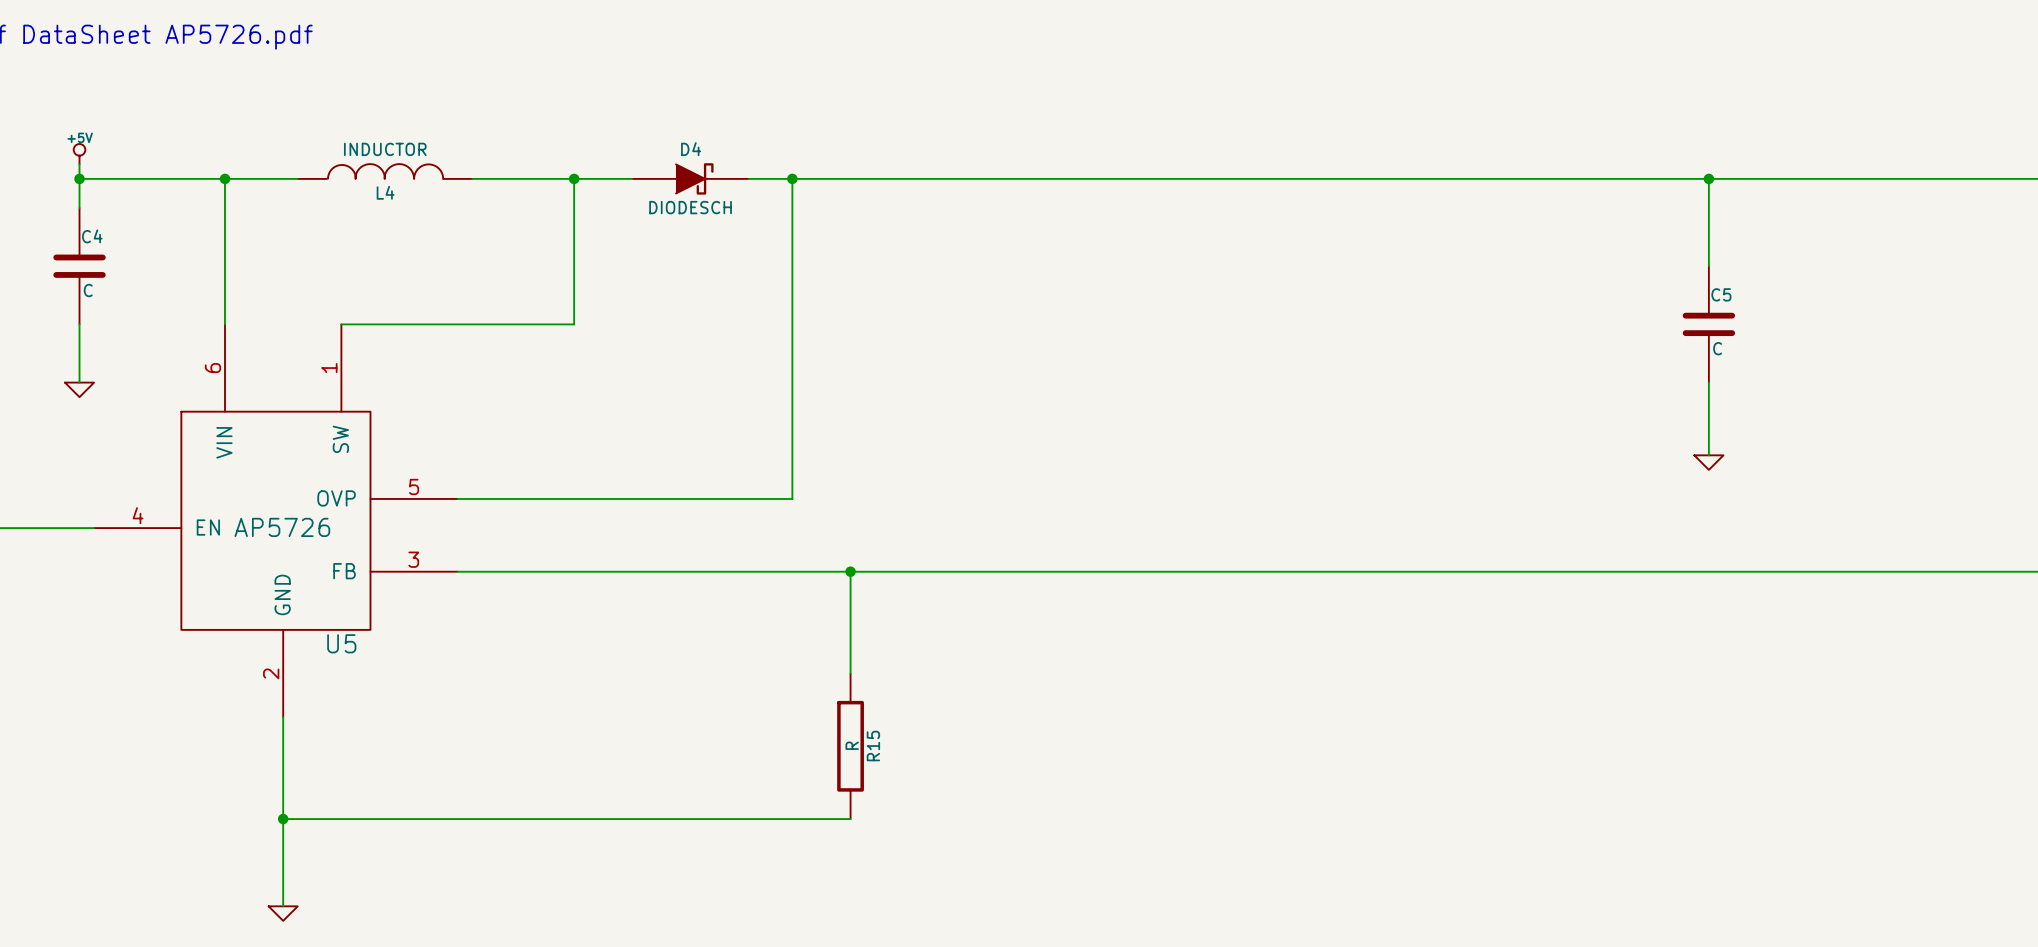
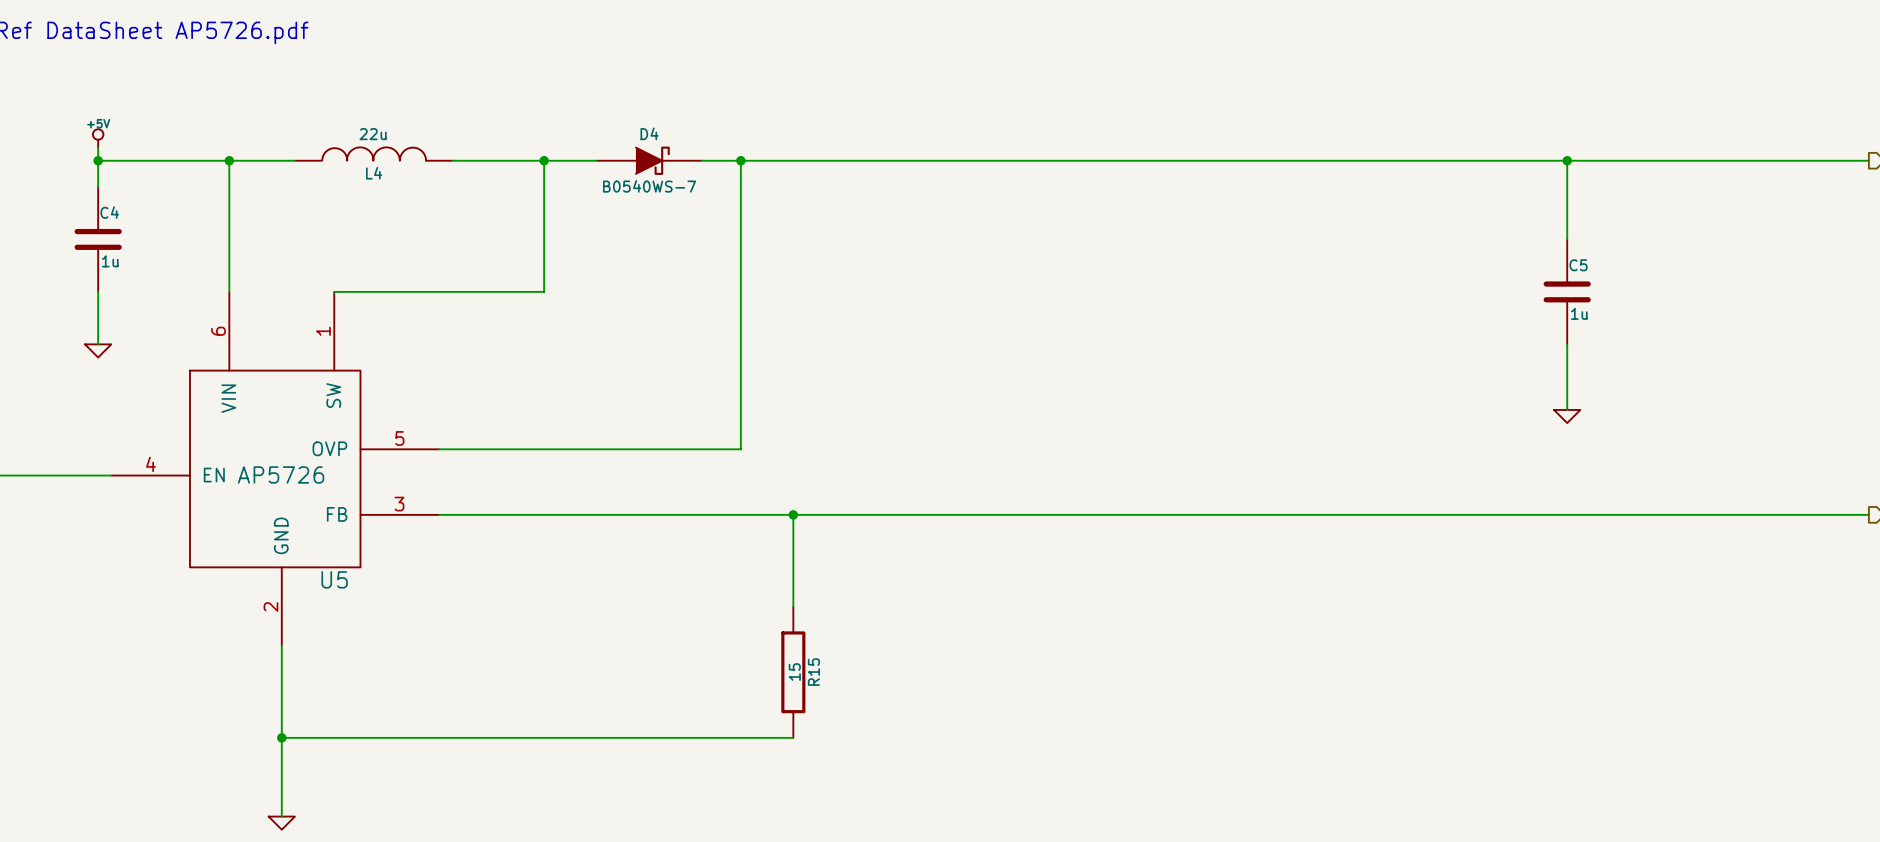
L4 value: INDUCTOR (385, 149) -> 22u (373, 134)
D4 value: DIODESCH (690, 207) -> B0540WS-7 (649, 186)
C4 value: C (88, 290) -> 1u (110, 261)
C5 value: C (1717, 348) -> 1u (1579, 313)
R15 value: R (852, 745) -> 15 (794, 672)

